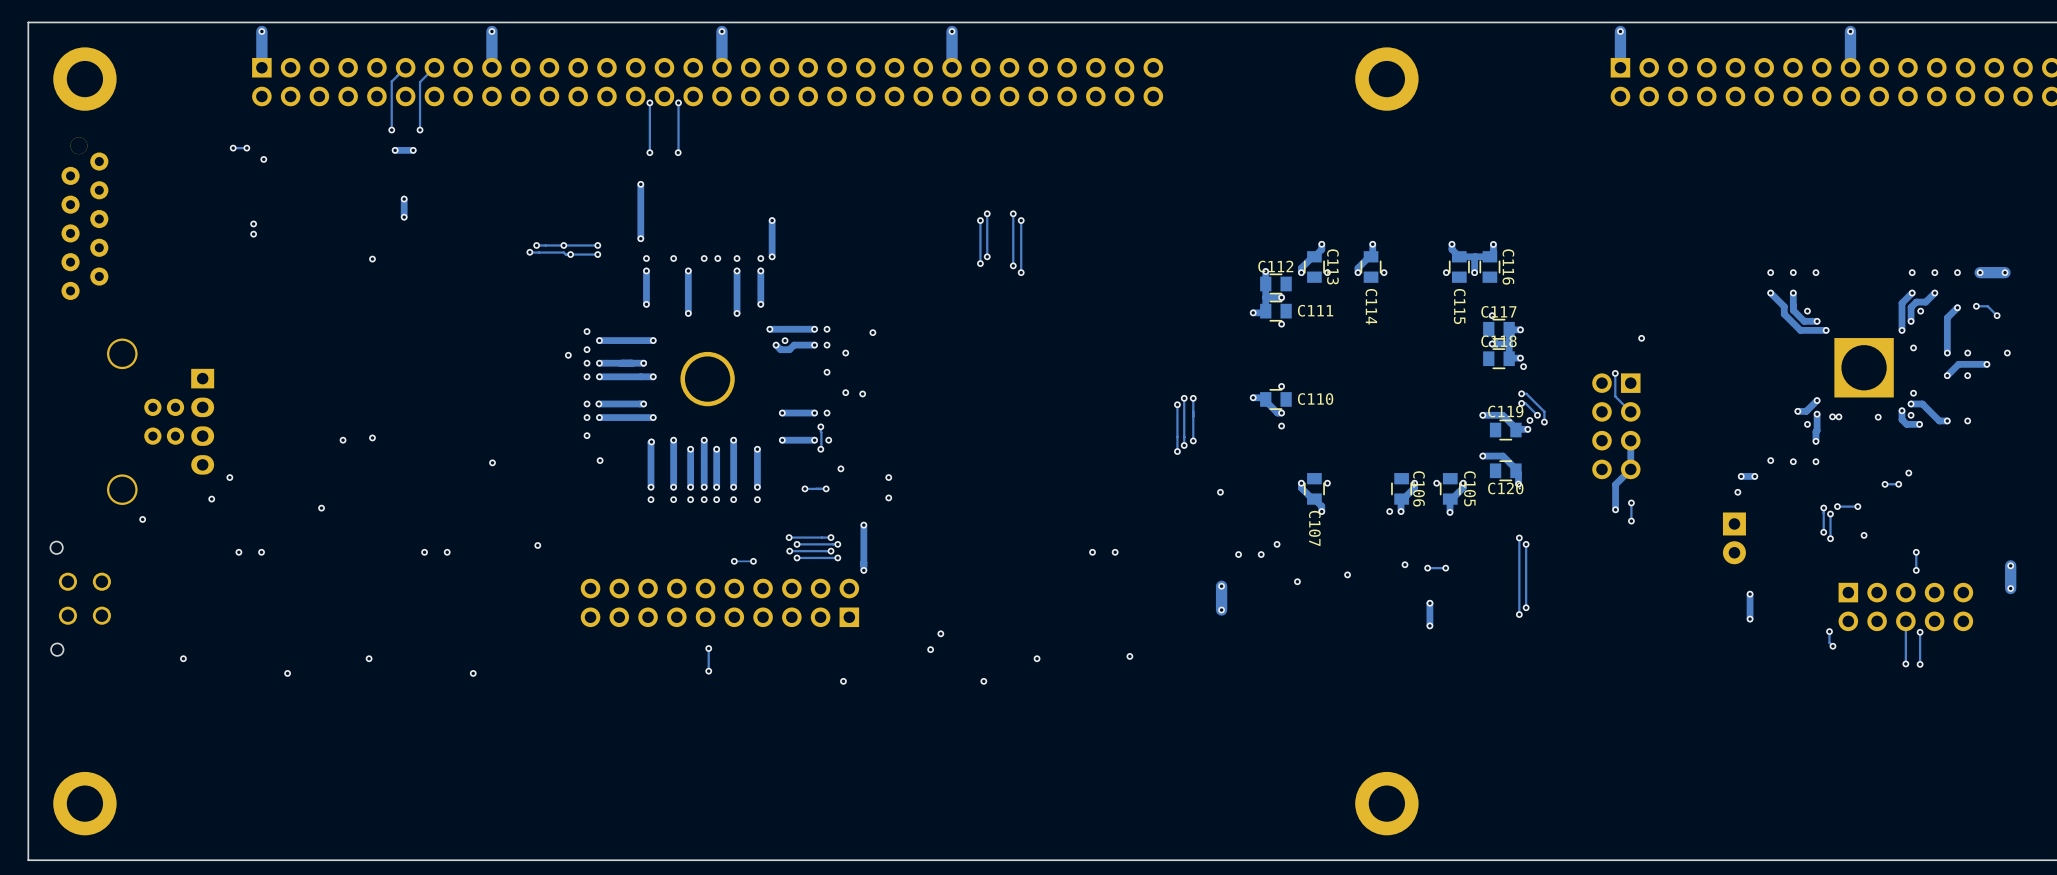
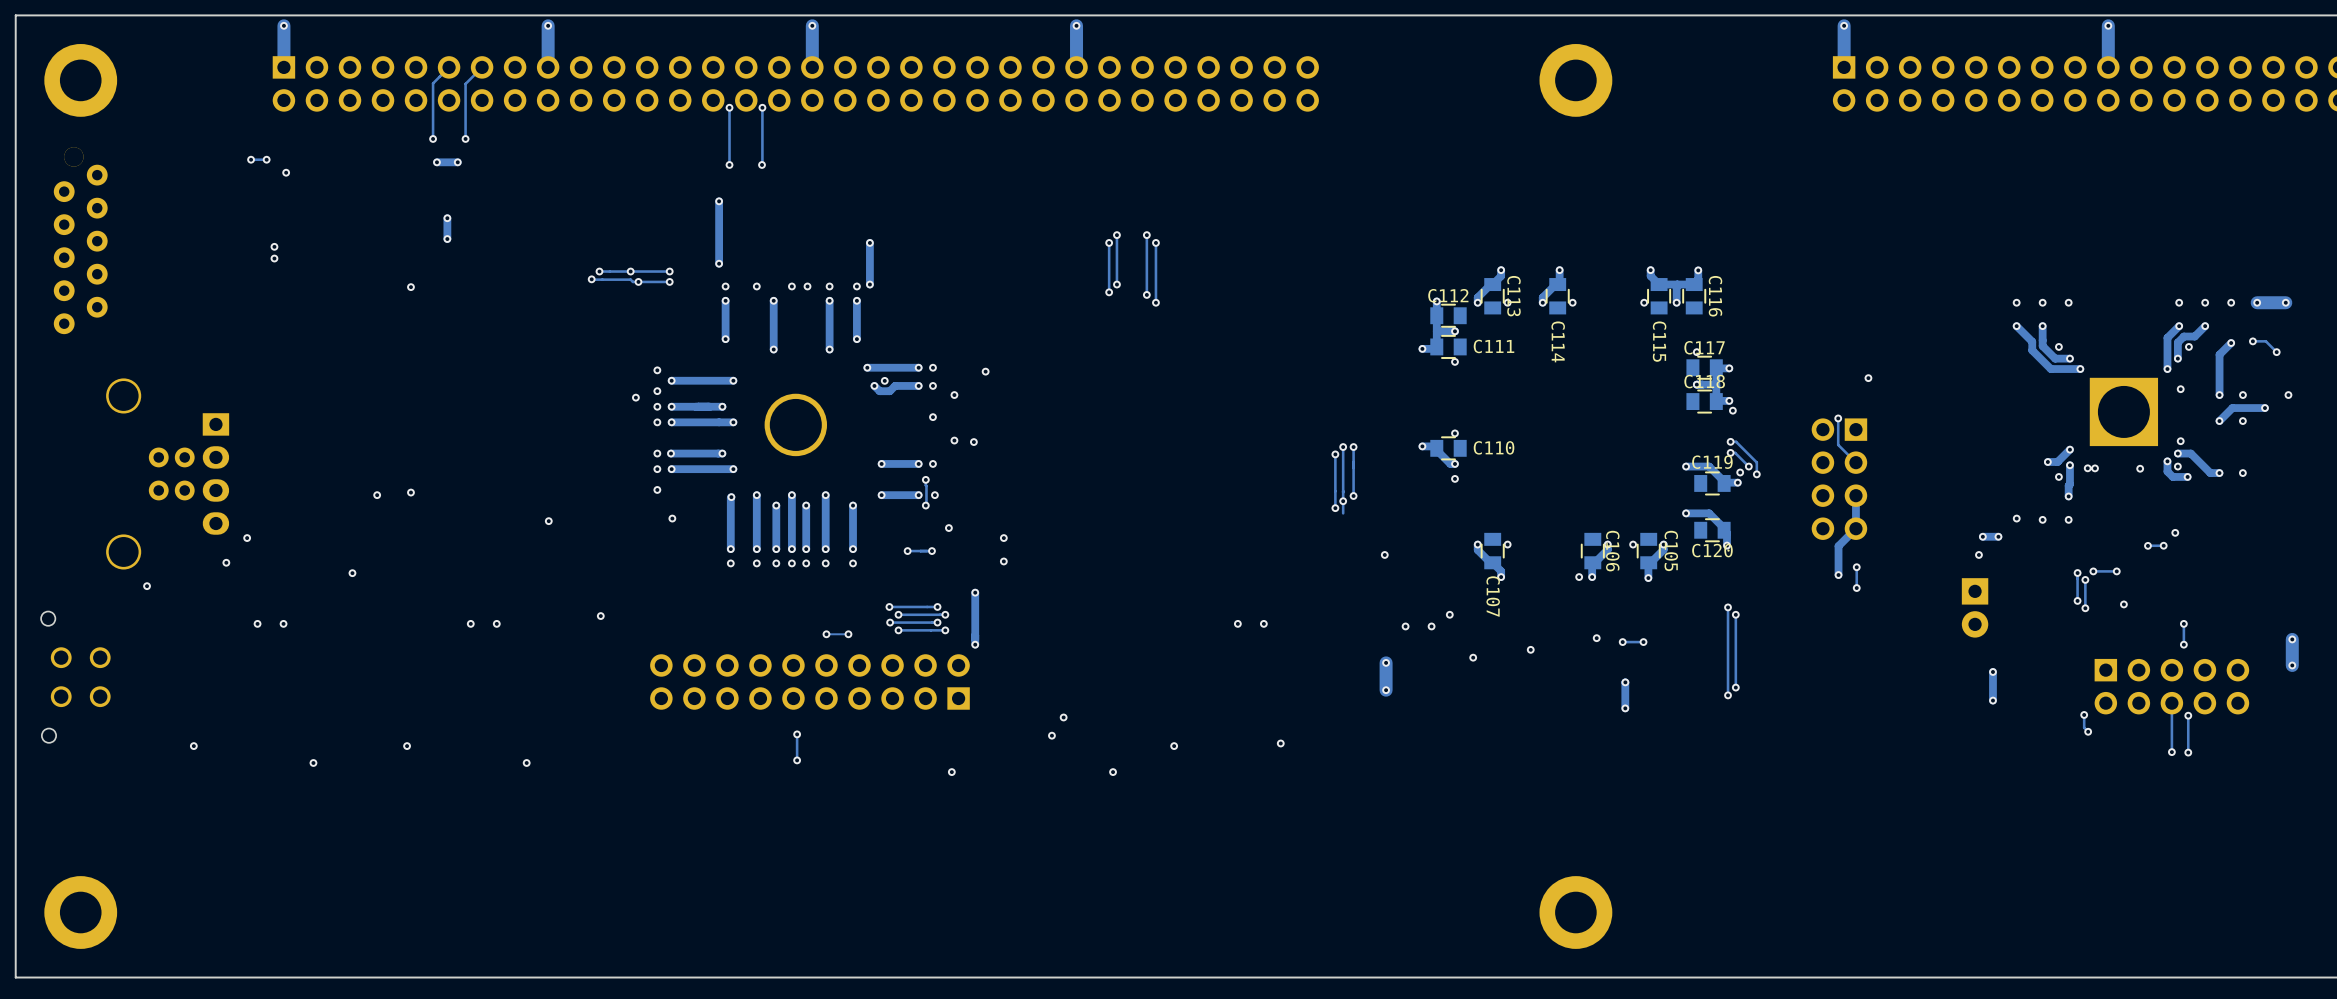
track: none -> (1343, 501) (1343, 513)

